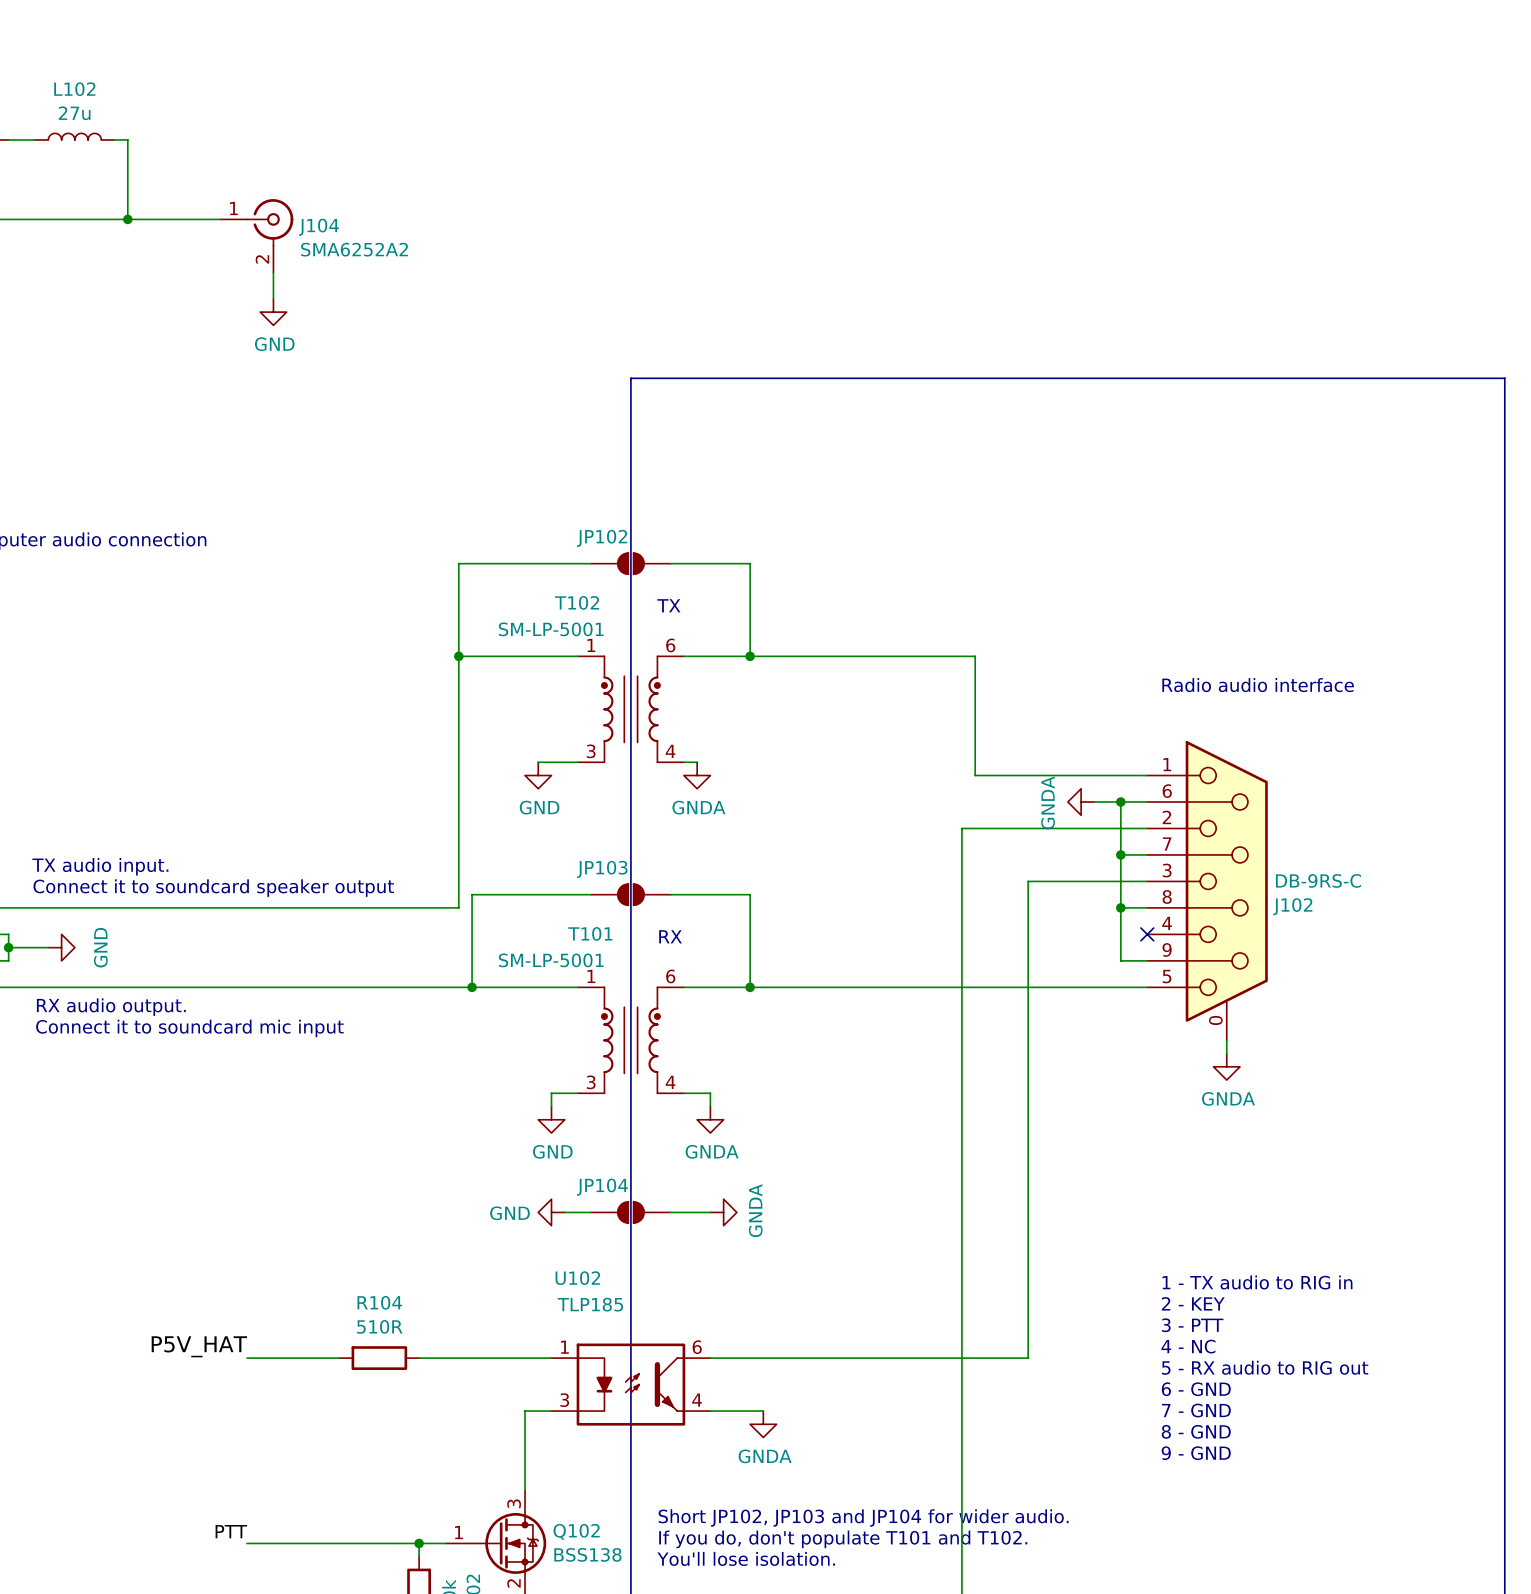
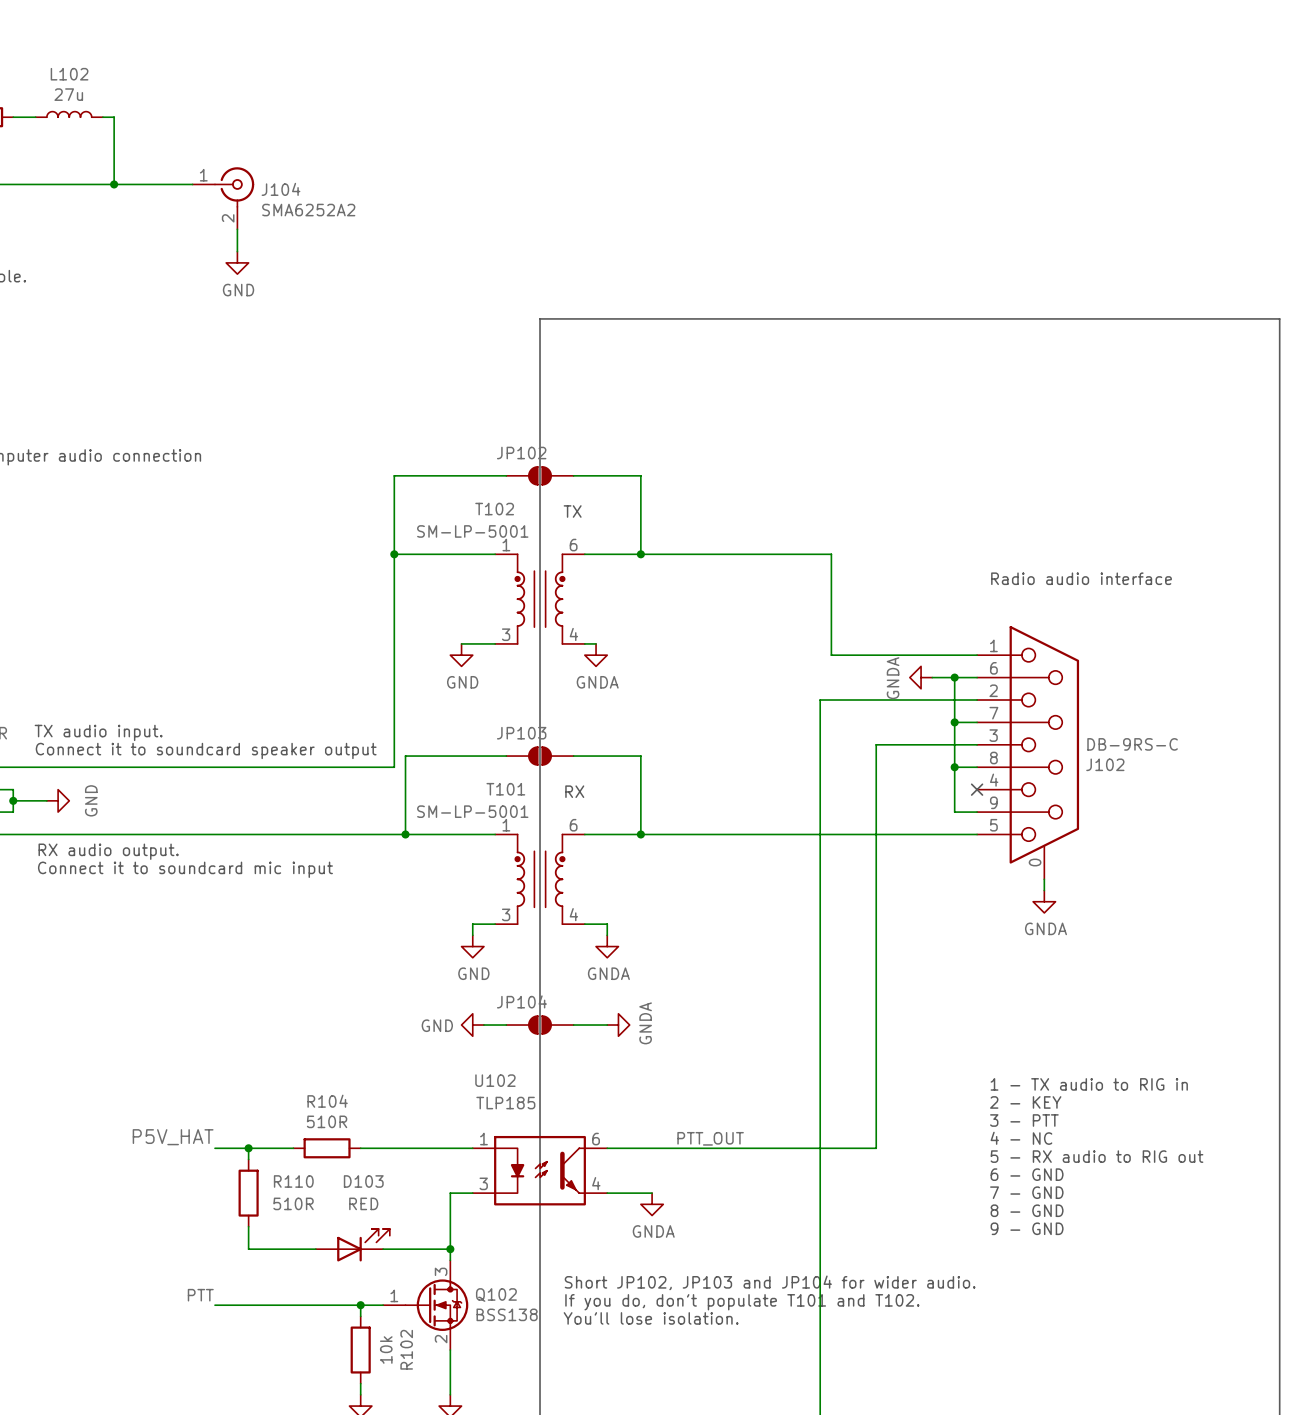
label: none -> PTT_OUT (710, 1138)
wire: none -> (248, 1148) (248, 1159)
junction: none -> (248, 1148)
R110: none -> 510R (248, 1193)
wire: none -> (248, 1226) (248, 1249) (315, 1249)
D103: none -> RED (352, 1245)
wire: none -> (383, 1249) (450, 1249)
junction: none -> (450, 1249)

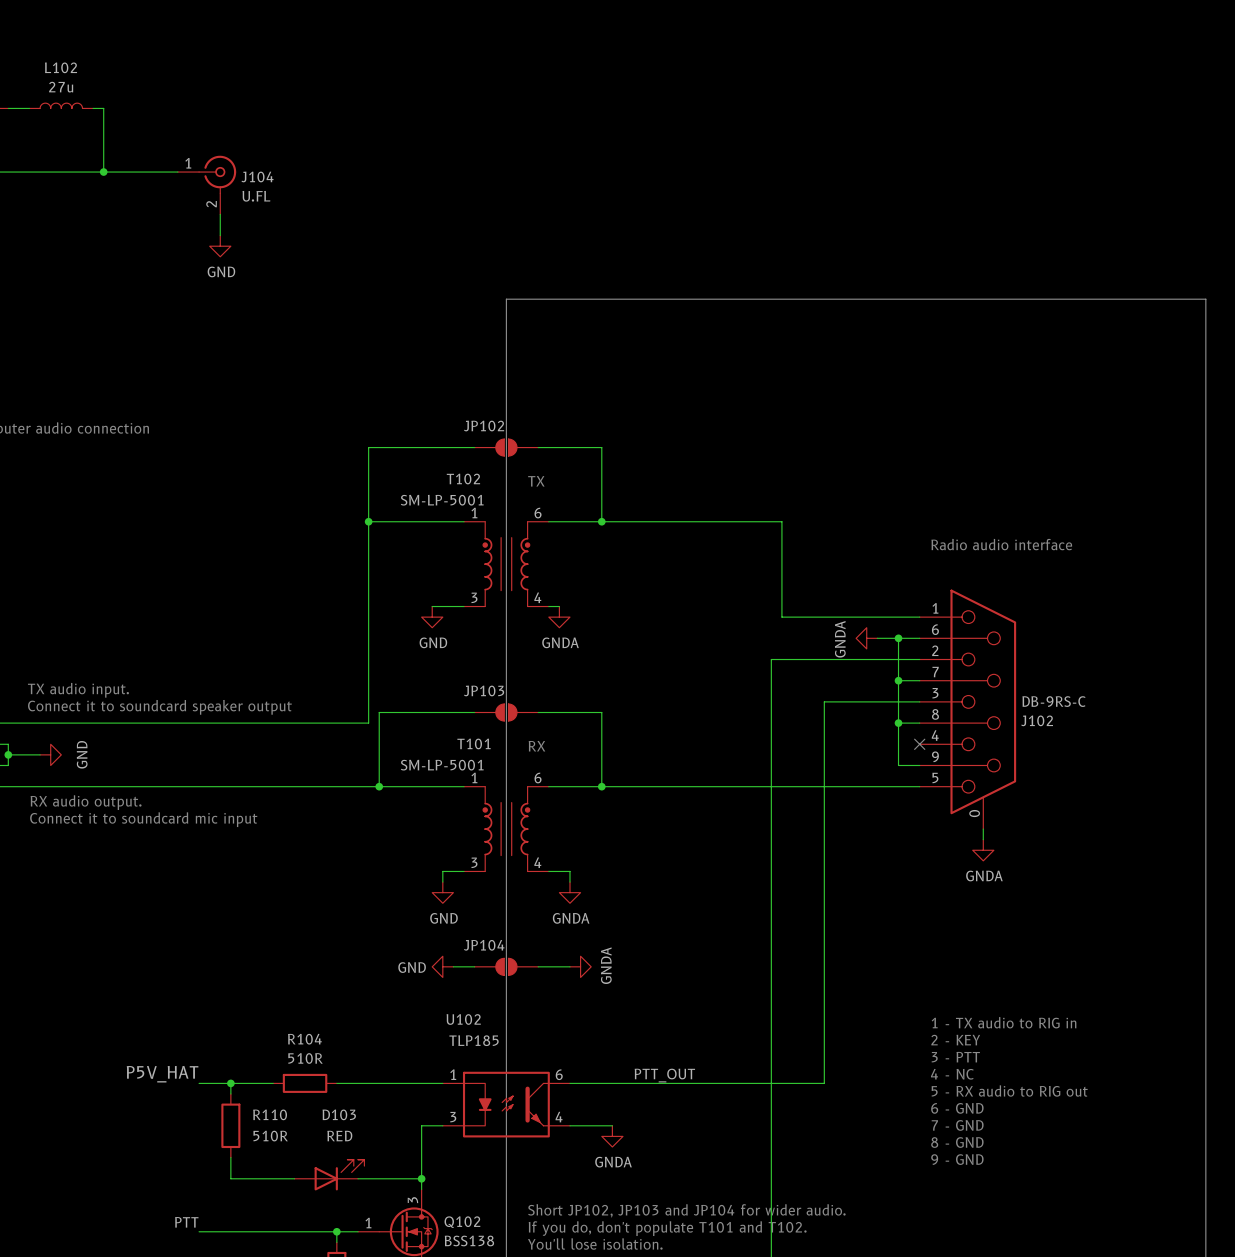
J104 value: SMA6252A2 (308, 210) -> U.FL (256, 196)

